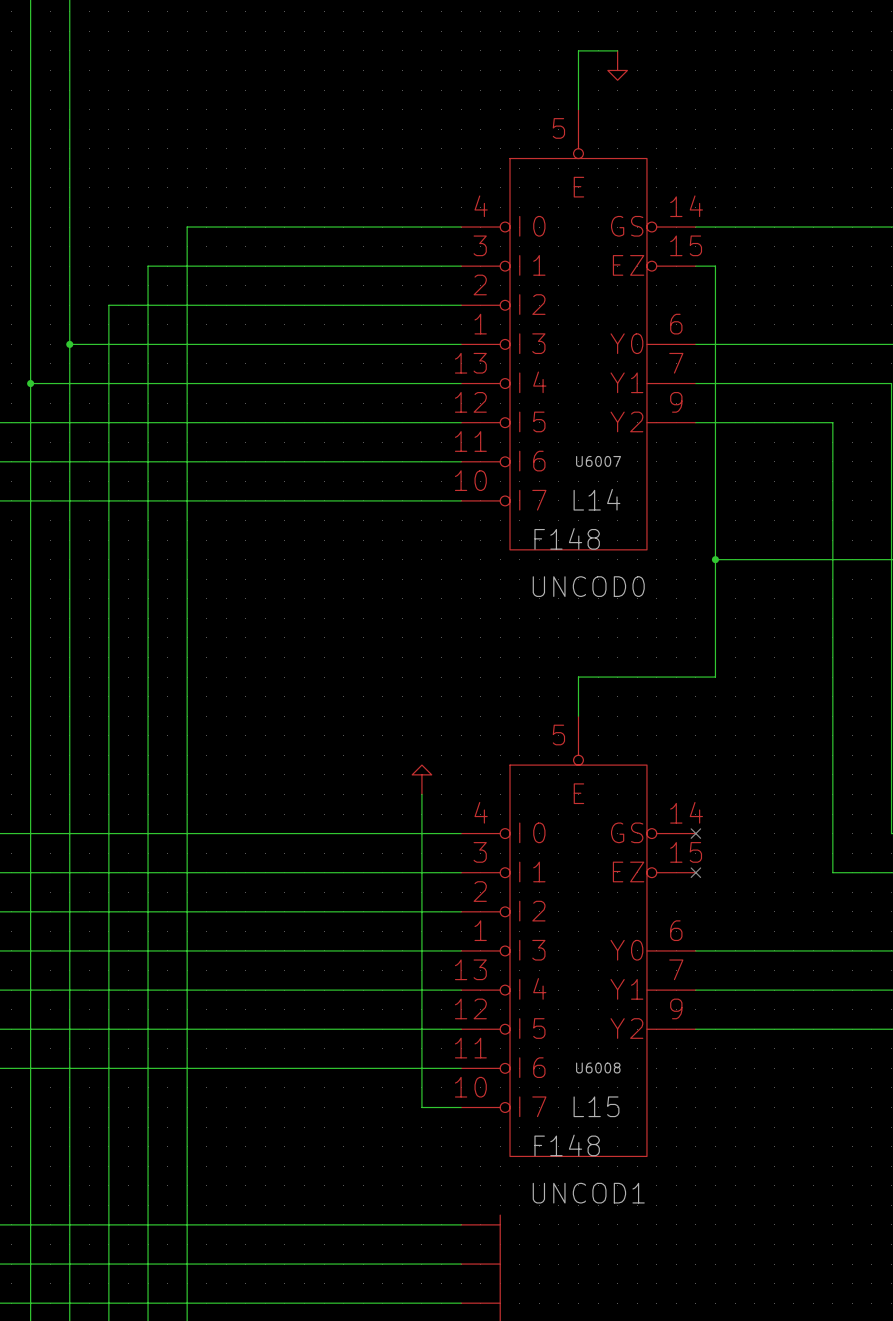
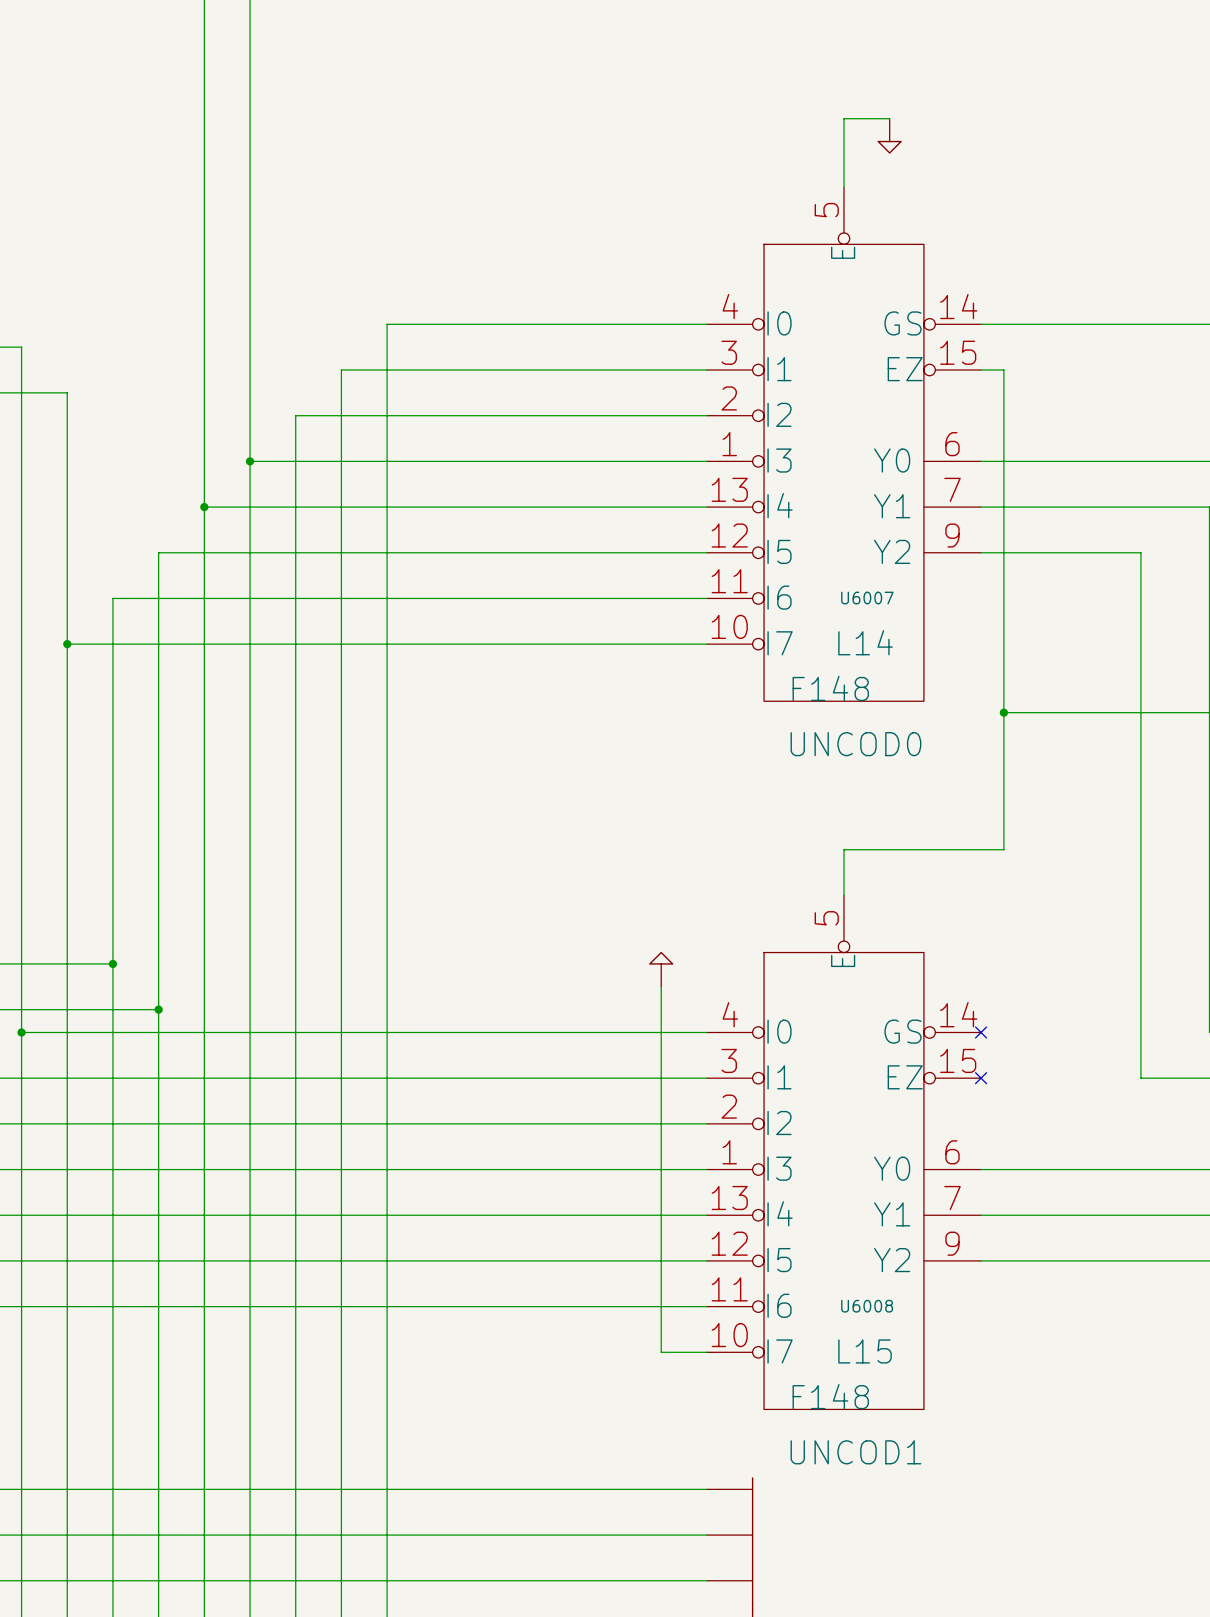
U6007 symbol: [461, 109, 696, 550] -> [706, 187, 982, 702]
U6008 symbol: [461, 716, 696, 1157] -> [706, 895, 982, 1410]

